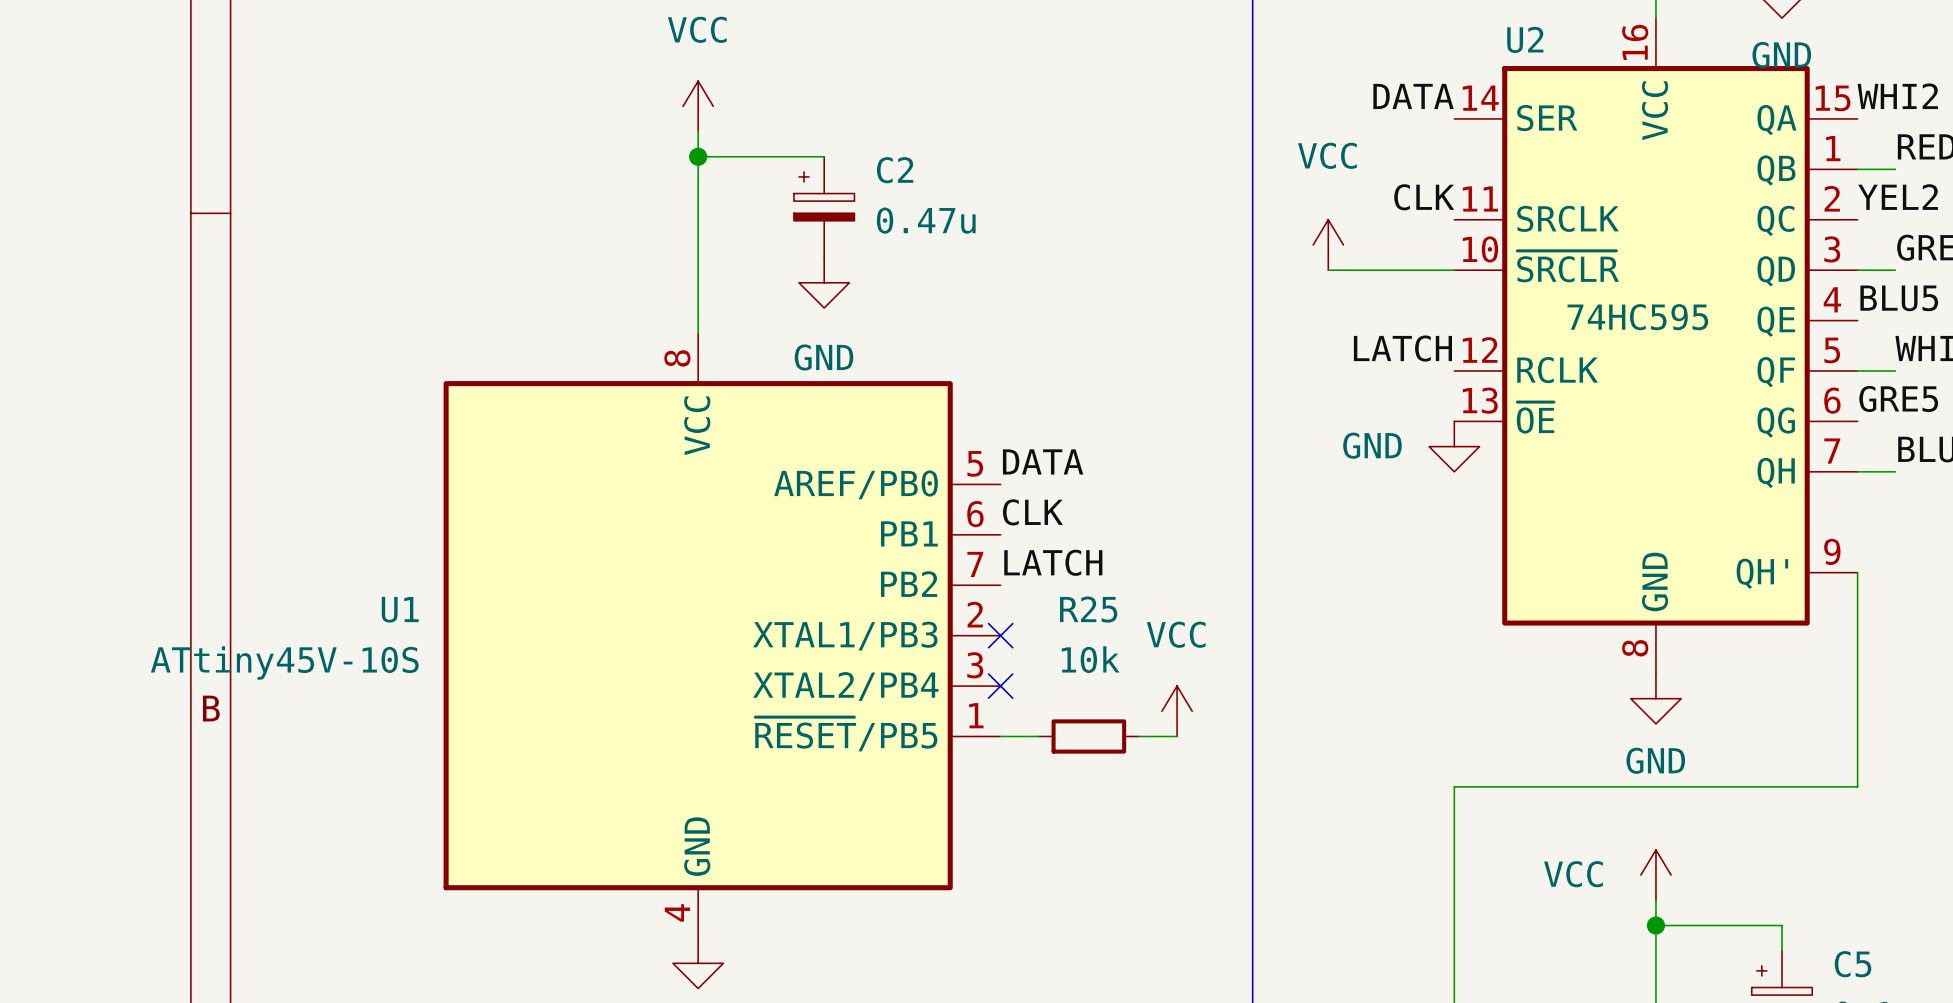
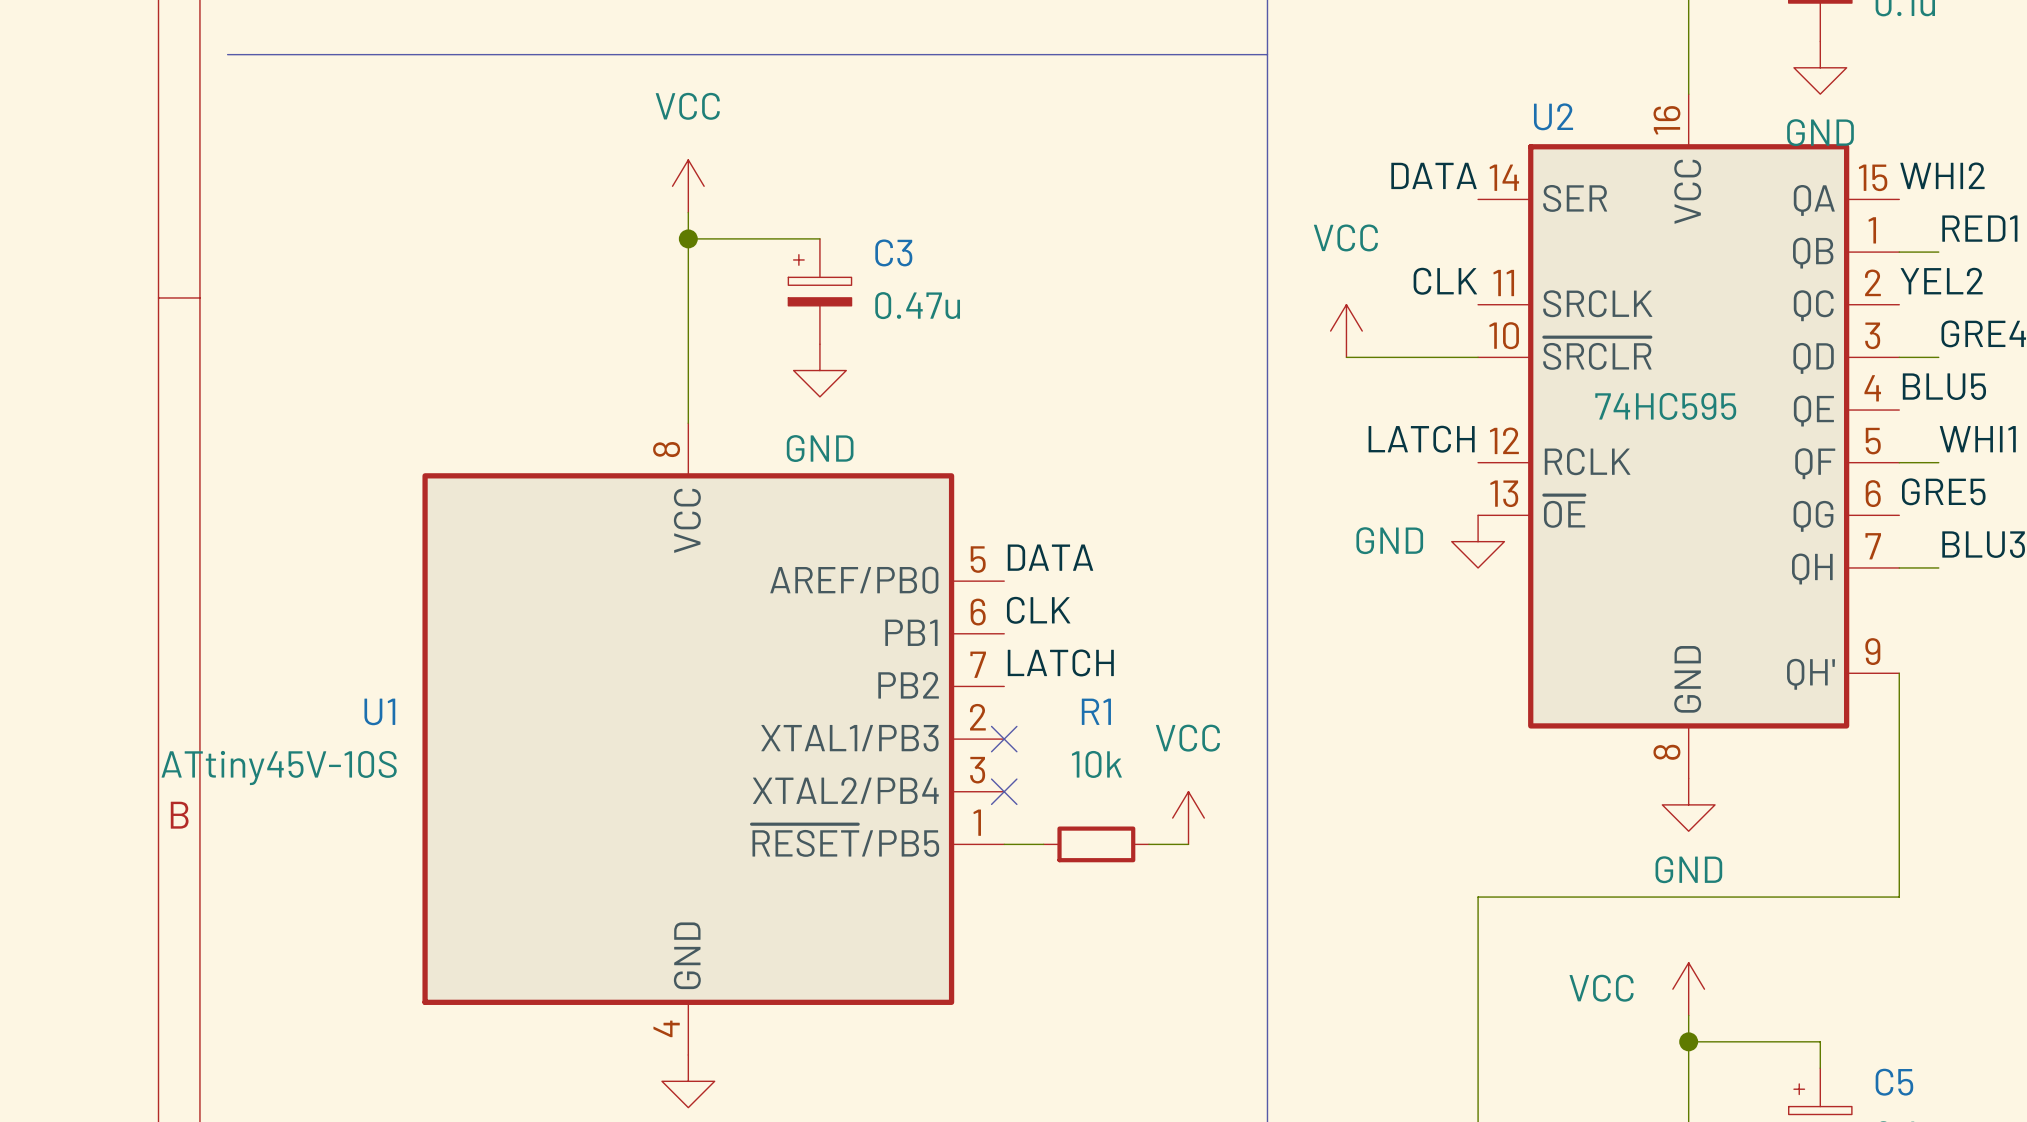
C2 name: C2 (895, 170) -> C3 (893, 252)
R25 name: R25 (1088, 609) -> R1 (1096, 711)

